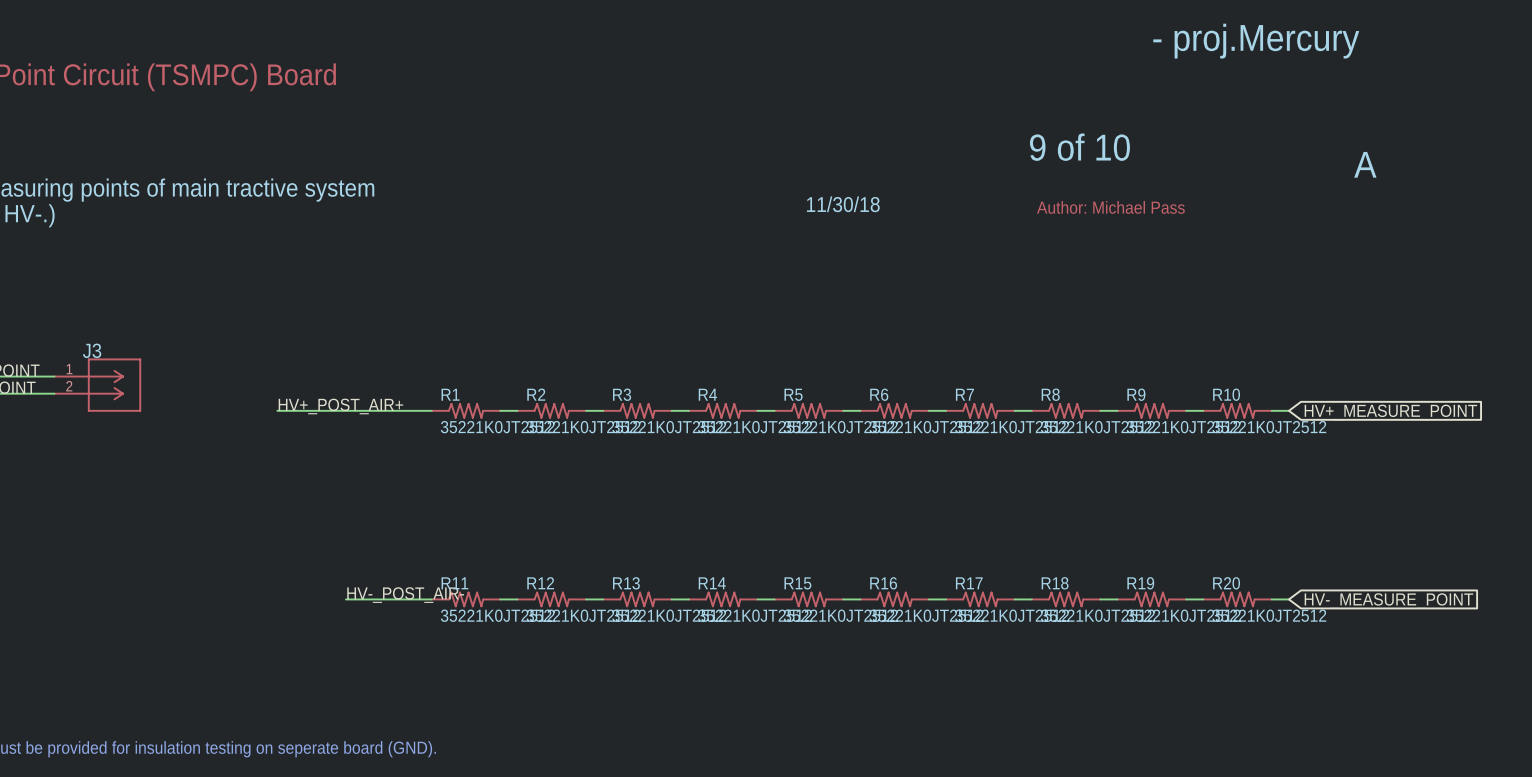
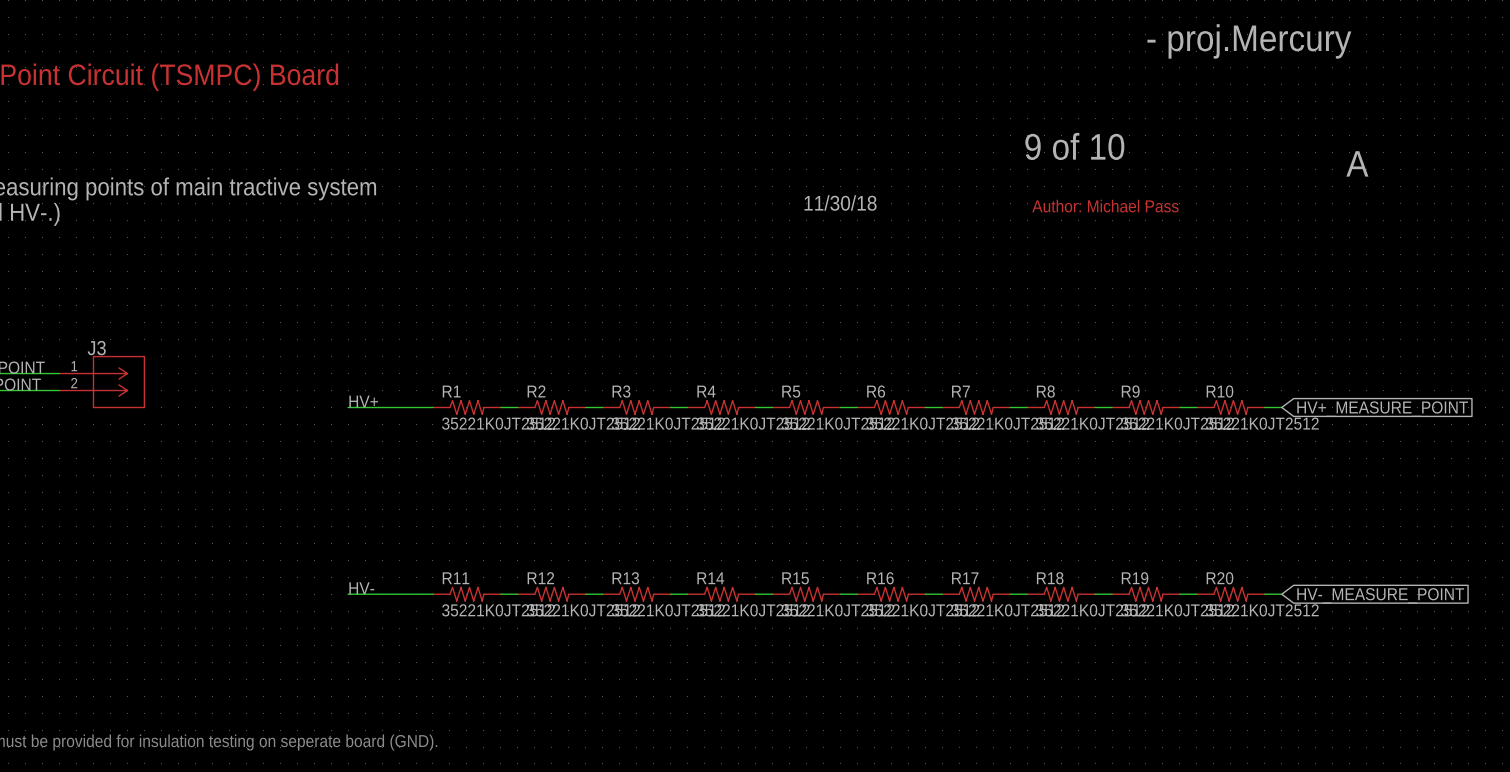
label: none -> HV+ (363, 401)
label: HV+_POST_AIR+ (340, 406) -> none
wire: (277, 410) (345, 410) -> none
label: HV-_POST_AIR- (405, 595) -> HV- (361, 588)

